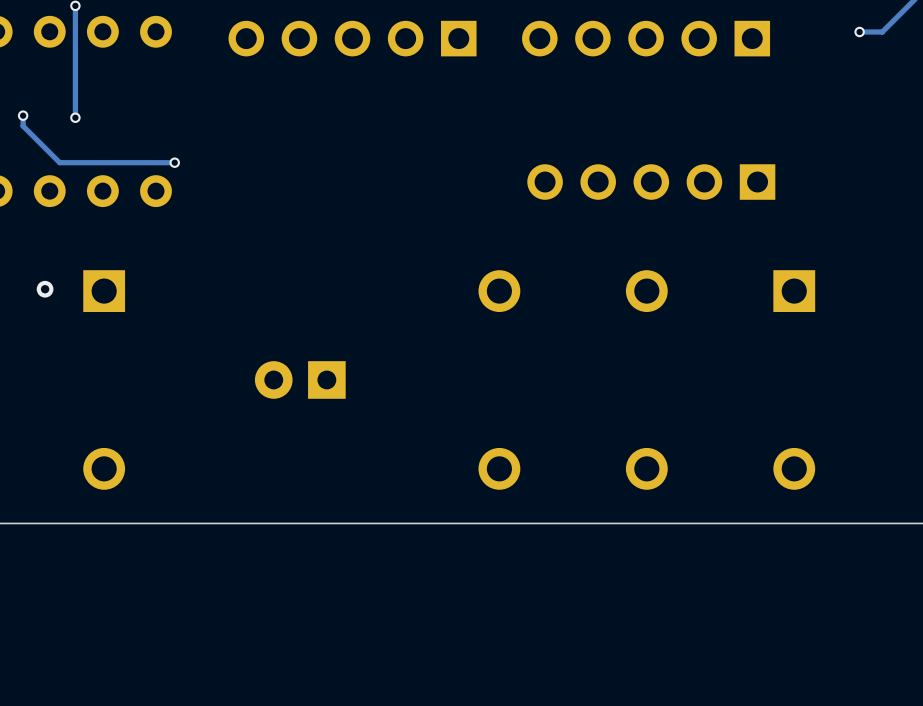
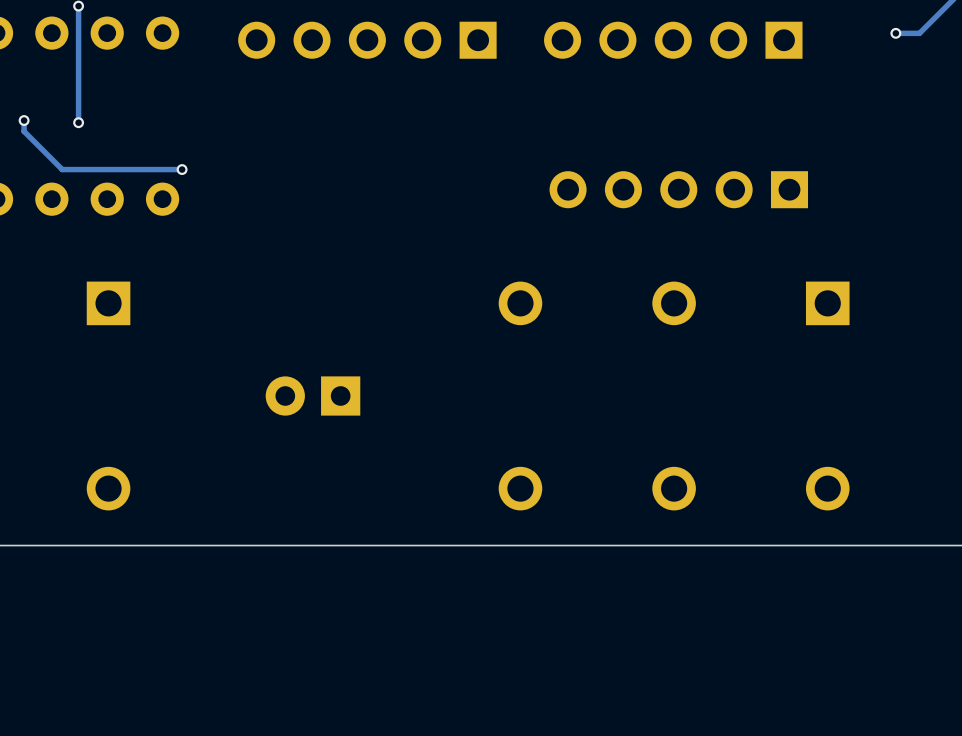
via: (45, 289) -> none

